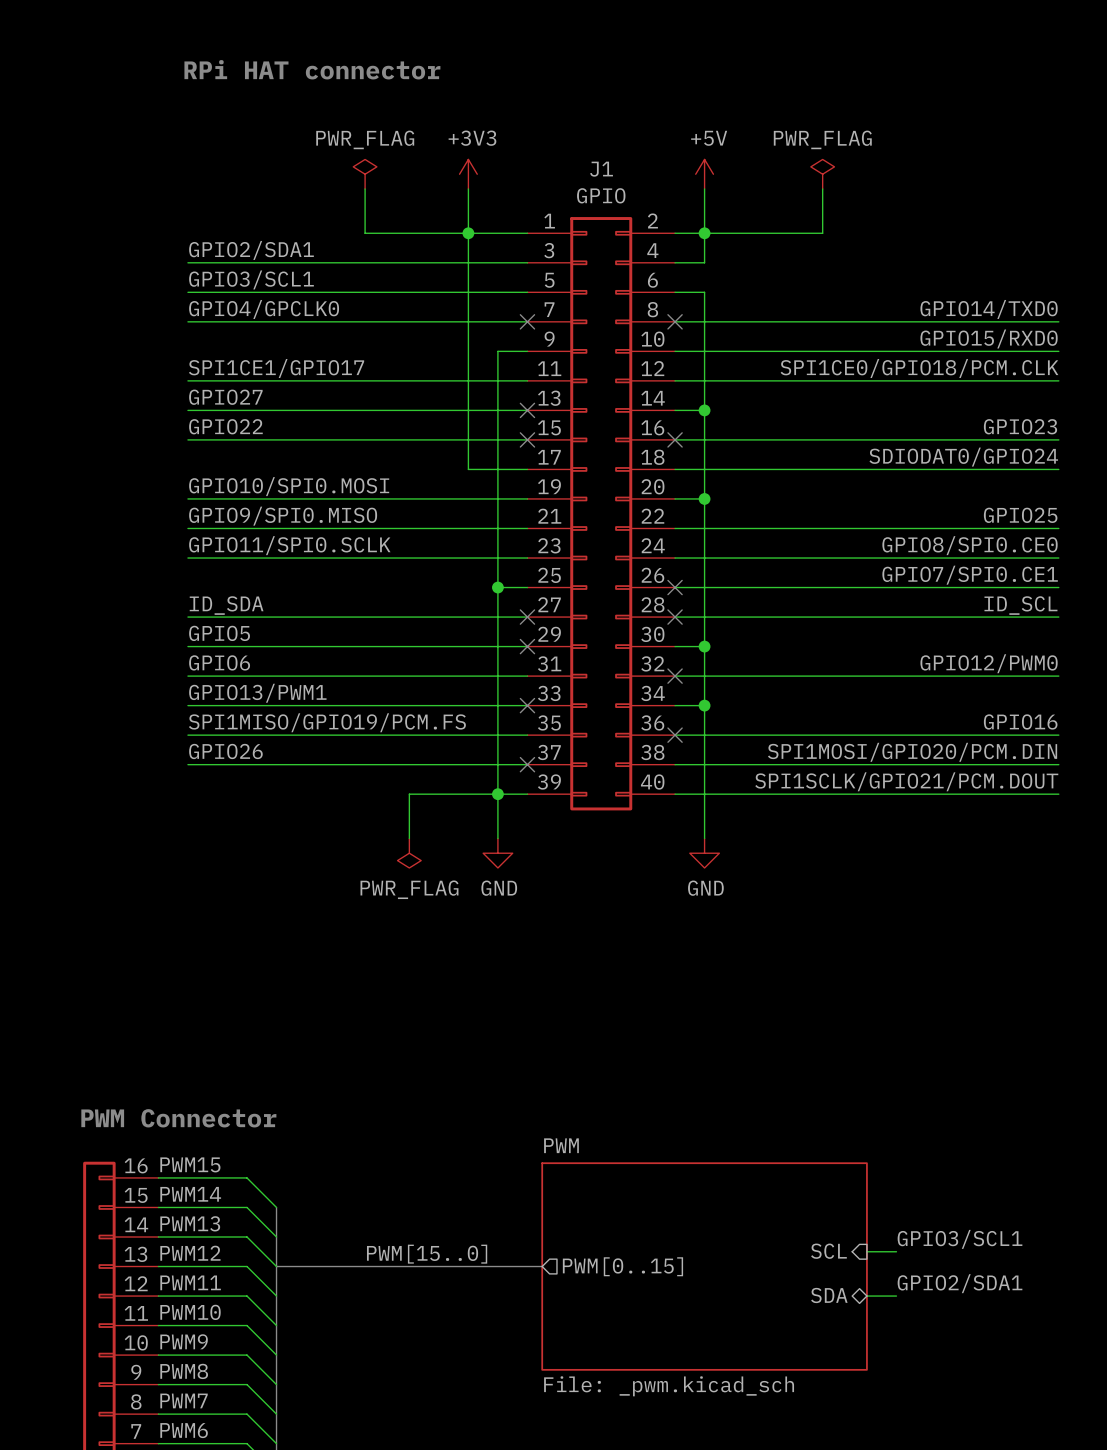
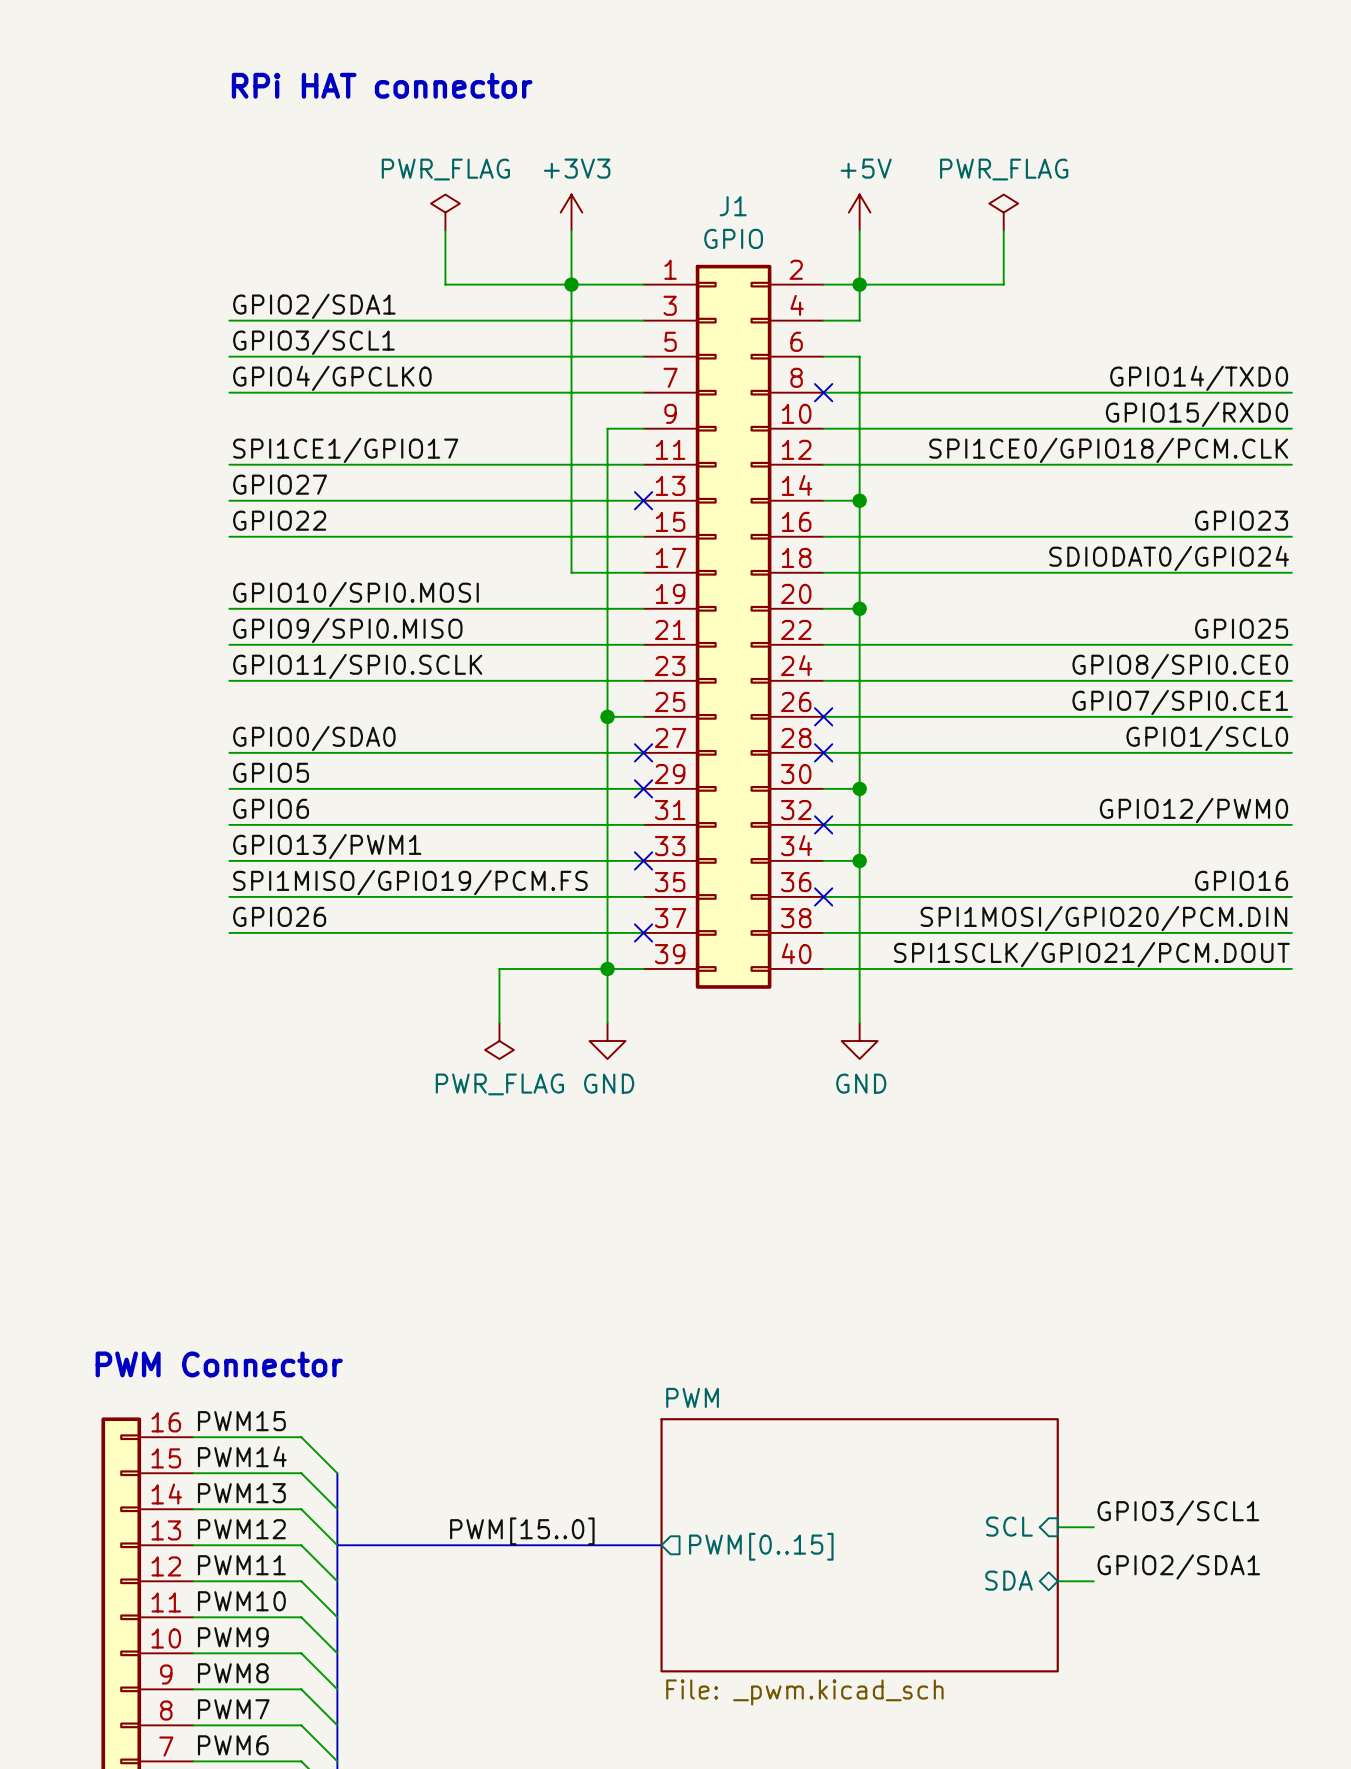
no-connect mark: (527, 321) -> none
no-connect mark: (527, 439) -> none
no-connect mark: (675, 439) -> none
label: ID_SDA (226, 605) -> GPIO0/SDA0 (314, 738)
label: ID_SCL (1020, 605) -> GPIO1/SCL0 (1207, 738)

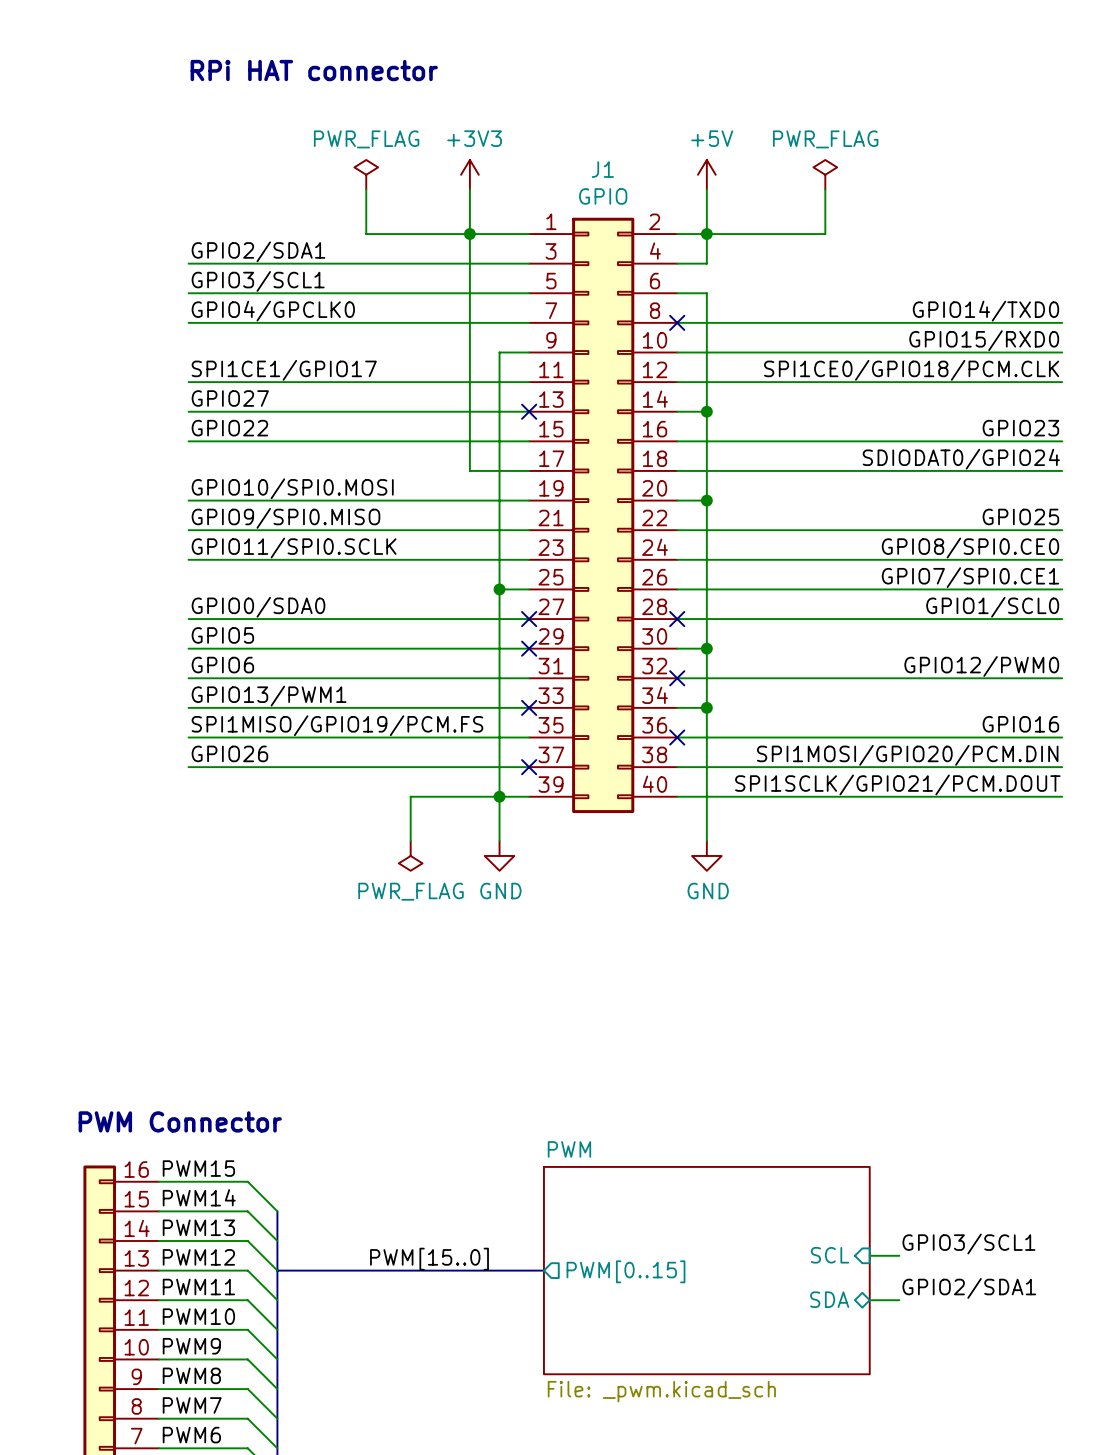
no-connect mark: (823, 716) -> none

